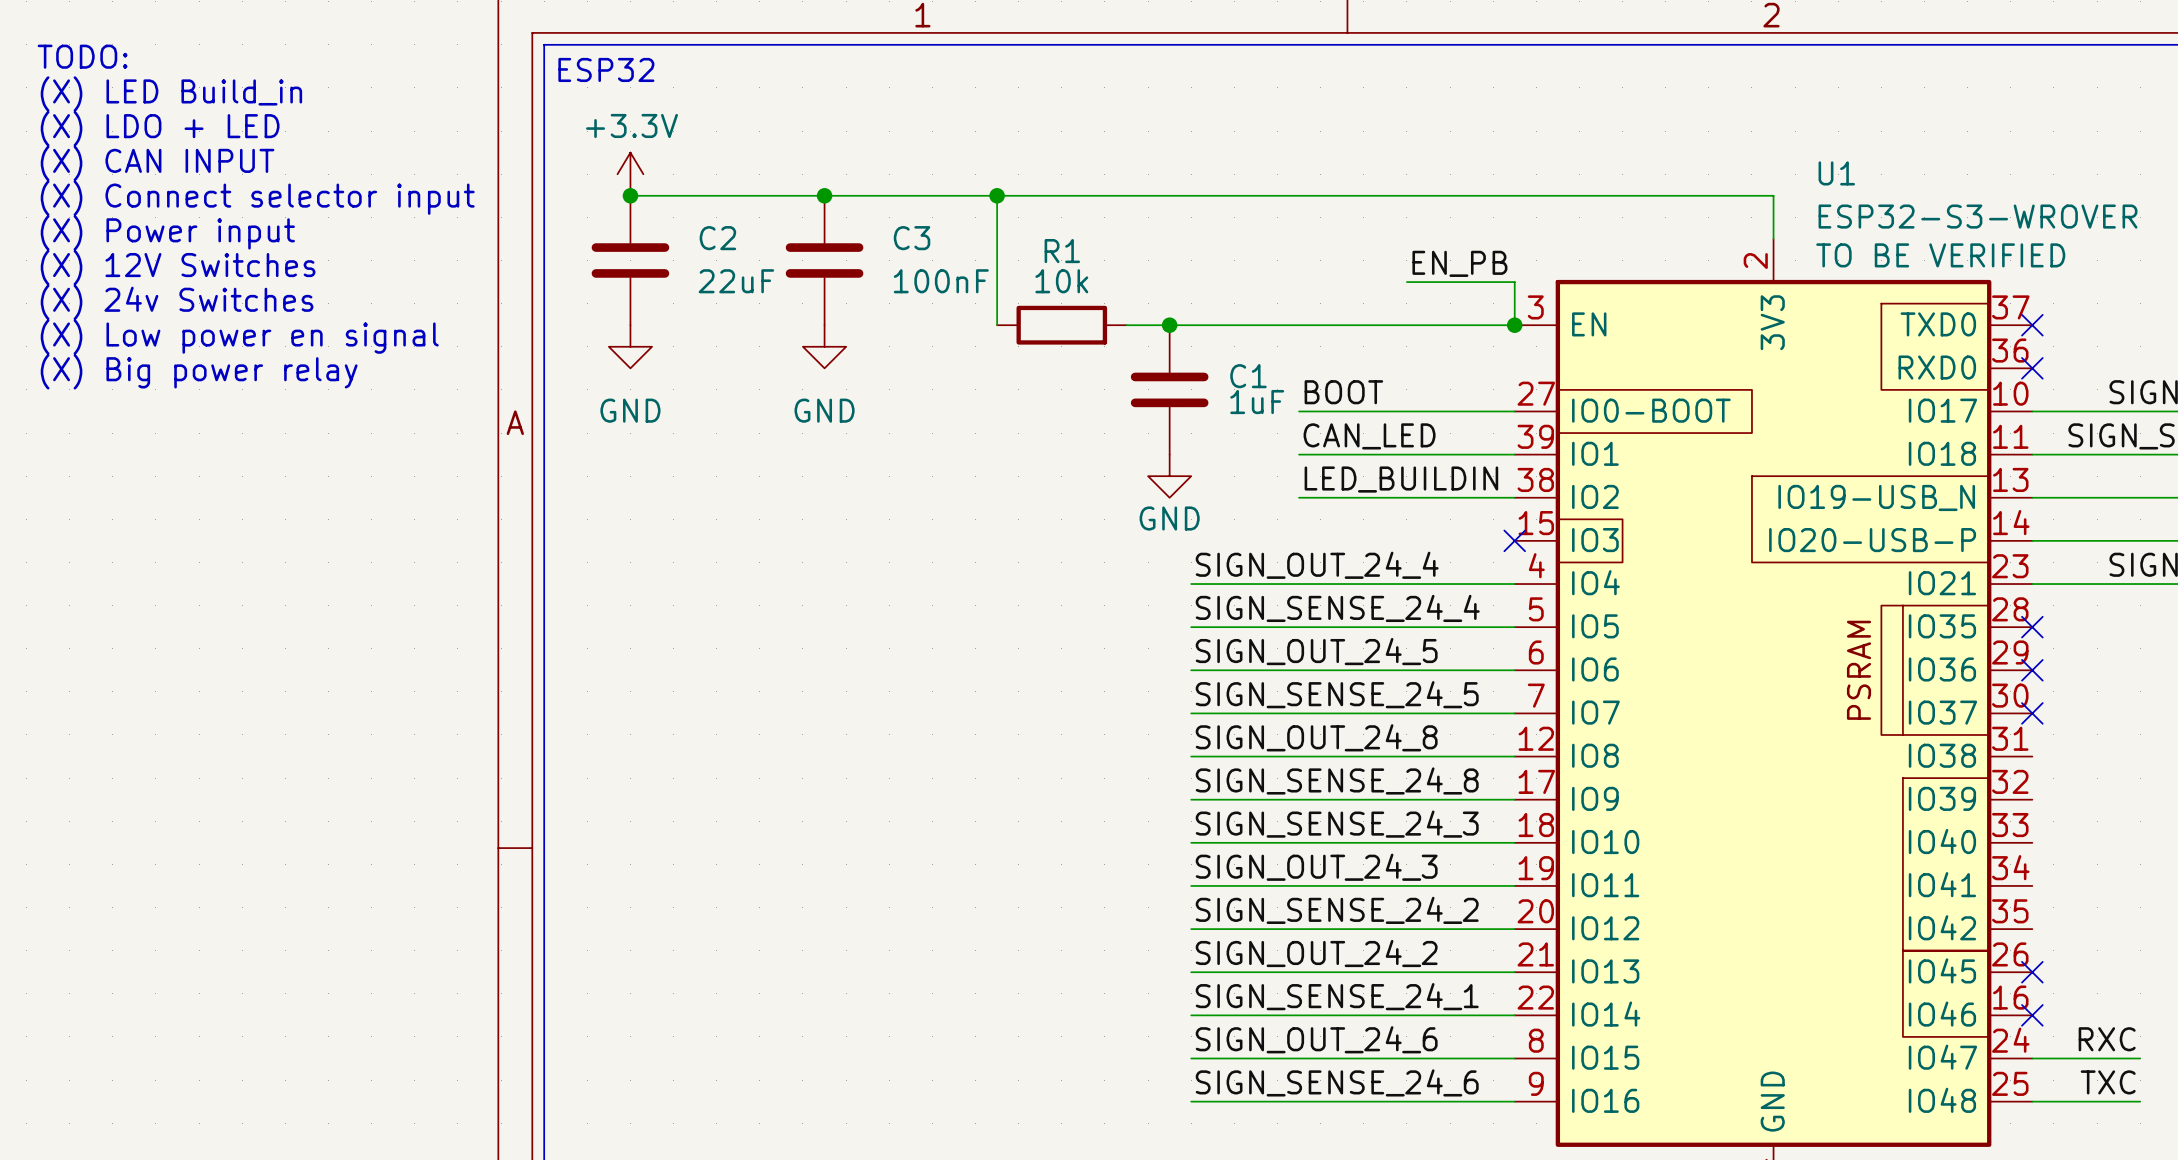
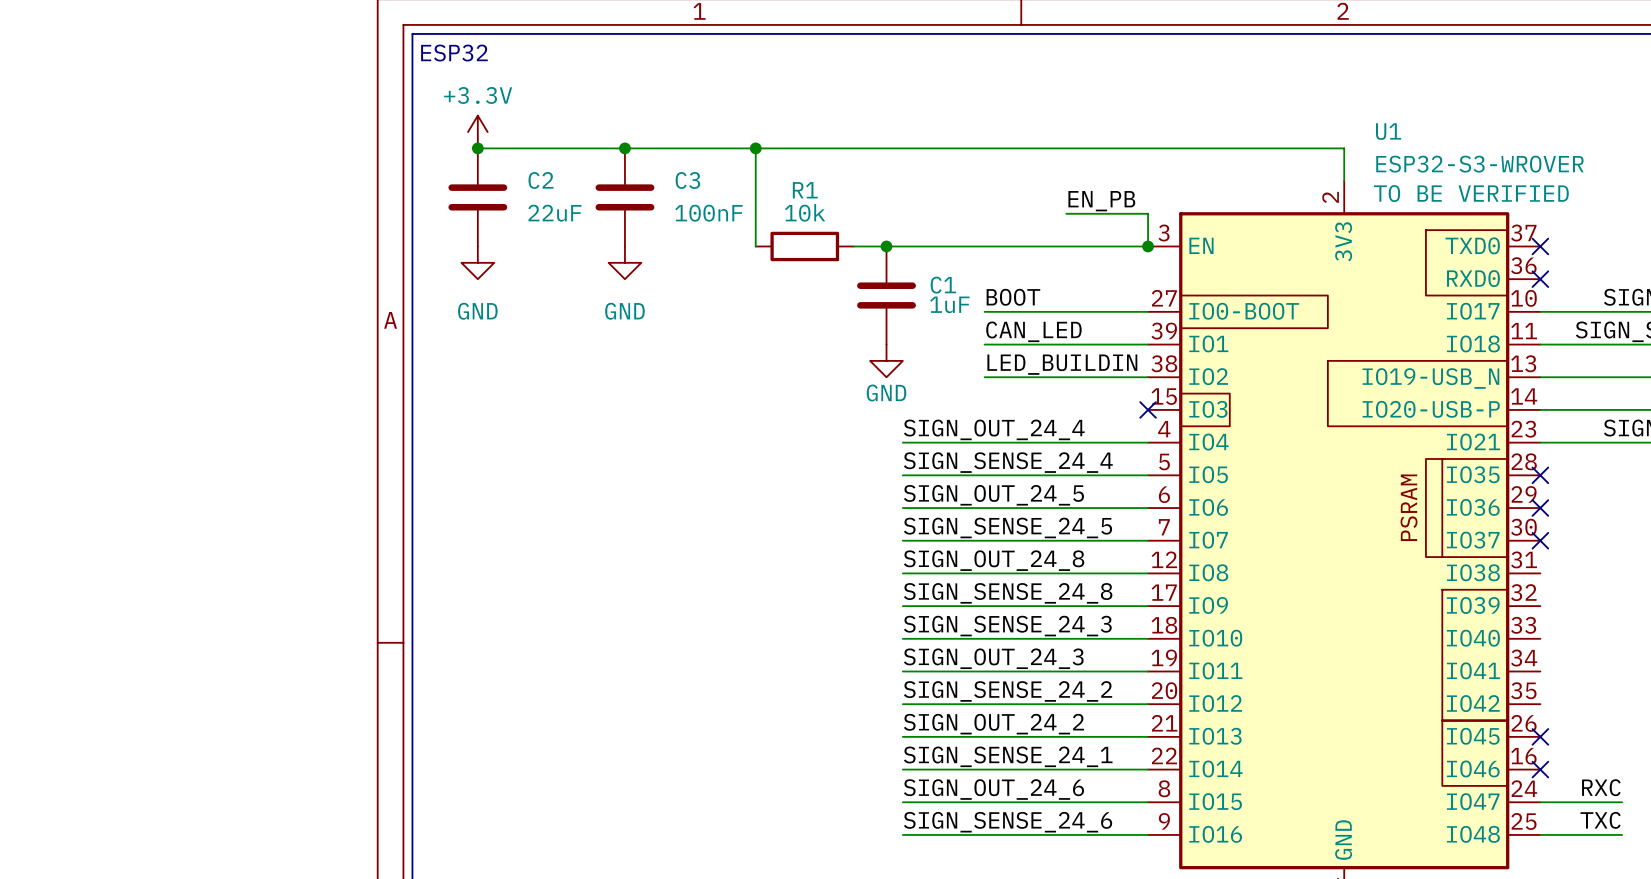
text: TODO: (82, 56) -> none
text: (X) LED Build_in (171, 93) -> none
text: (X) LDO + LED (160, 128) -> none
text: (X) CAN INPUT (157, 163) -> none
text: (X) Connect selector input (257, 198) -> none
text: (X) Power input (167, 232) -> none
text: (X) 12V Switches (178, 267) -> none
text: (X) 24v Switches (177, 302) -> none
text: (X) Low power en signal (239, 337) -> none
text: (X) Big power relay (199, 371) -> none

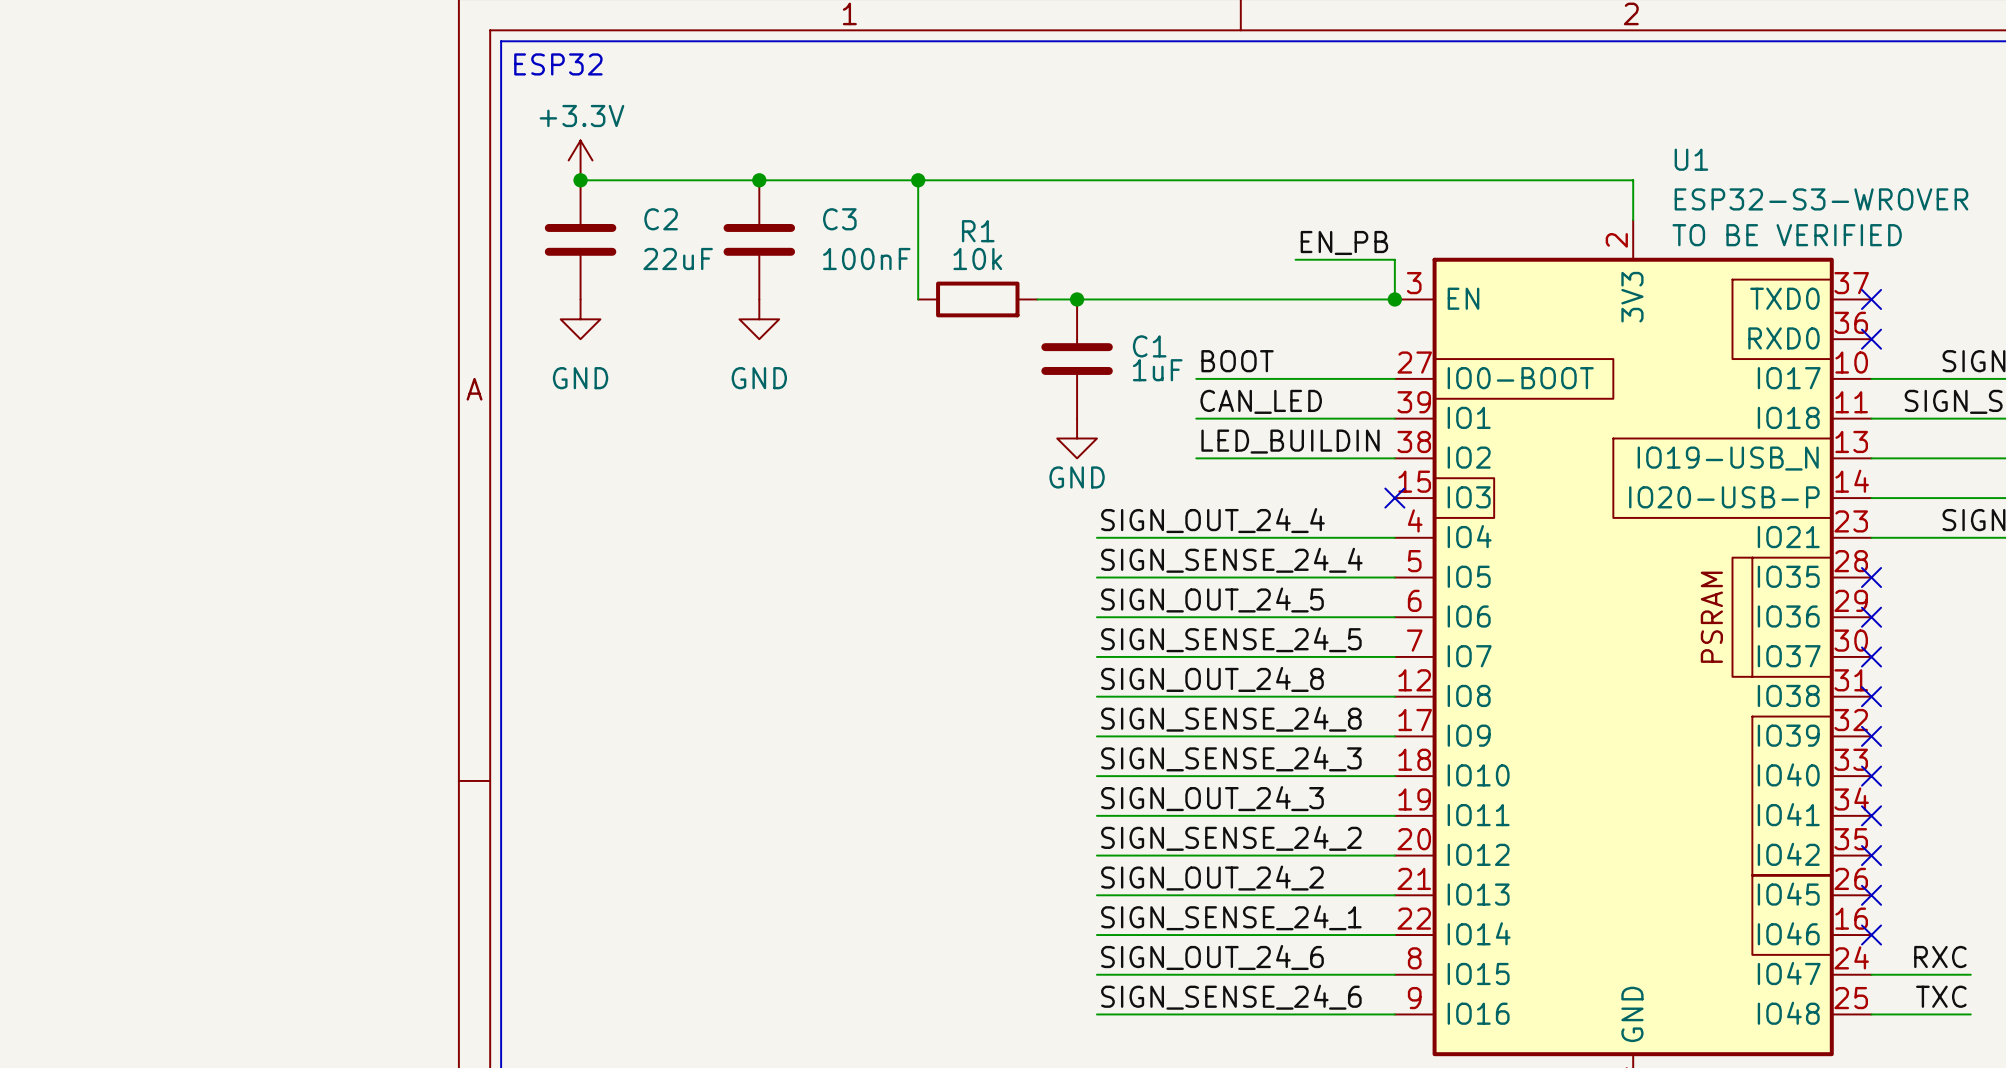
no-connect mark: none -> (1871, 696)
no-connect mark: none -> (1871, 736)
no-connect mark: none -> (1871, 776)
no-connect mark: none -> (1871, 815)
no-connect mark: none -> (1871, 855)

